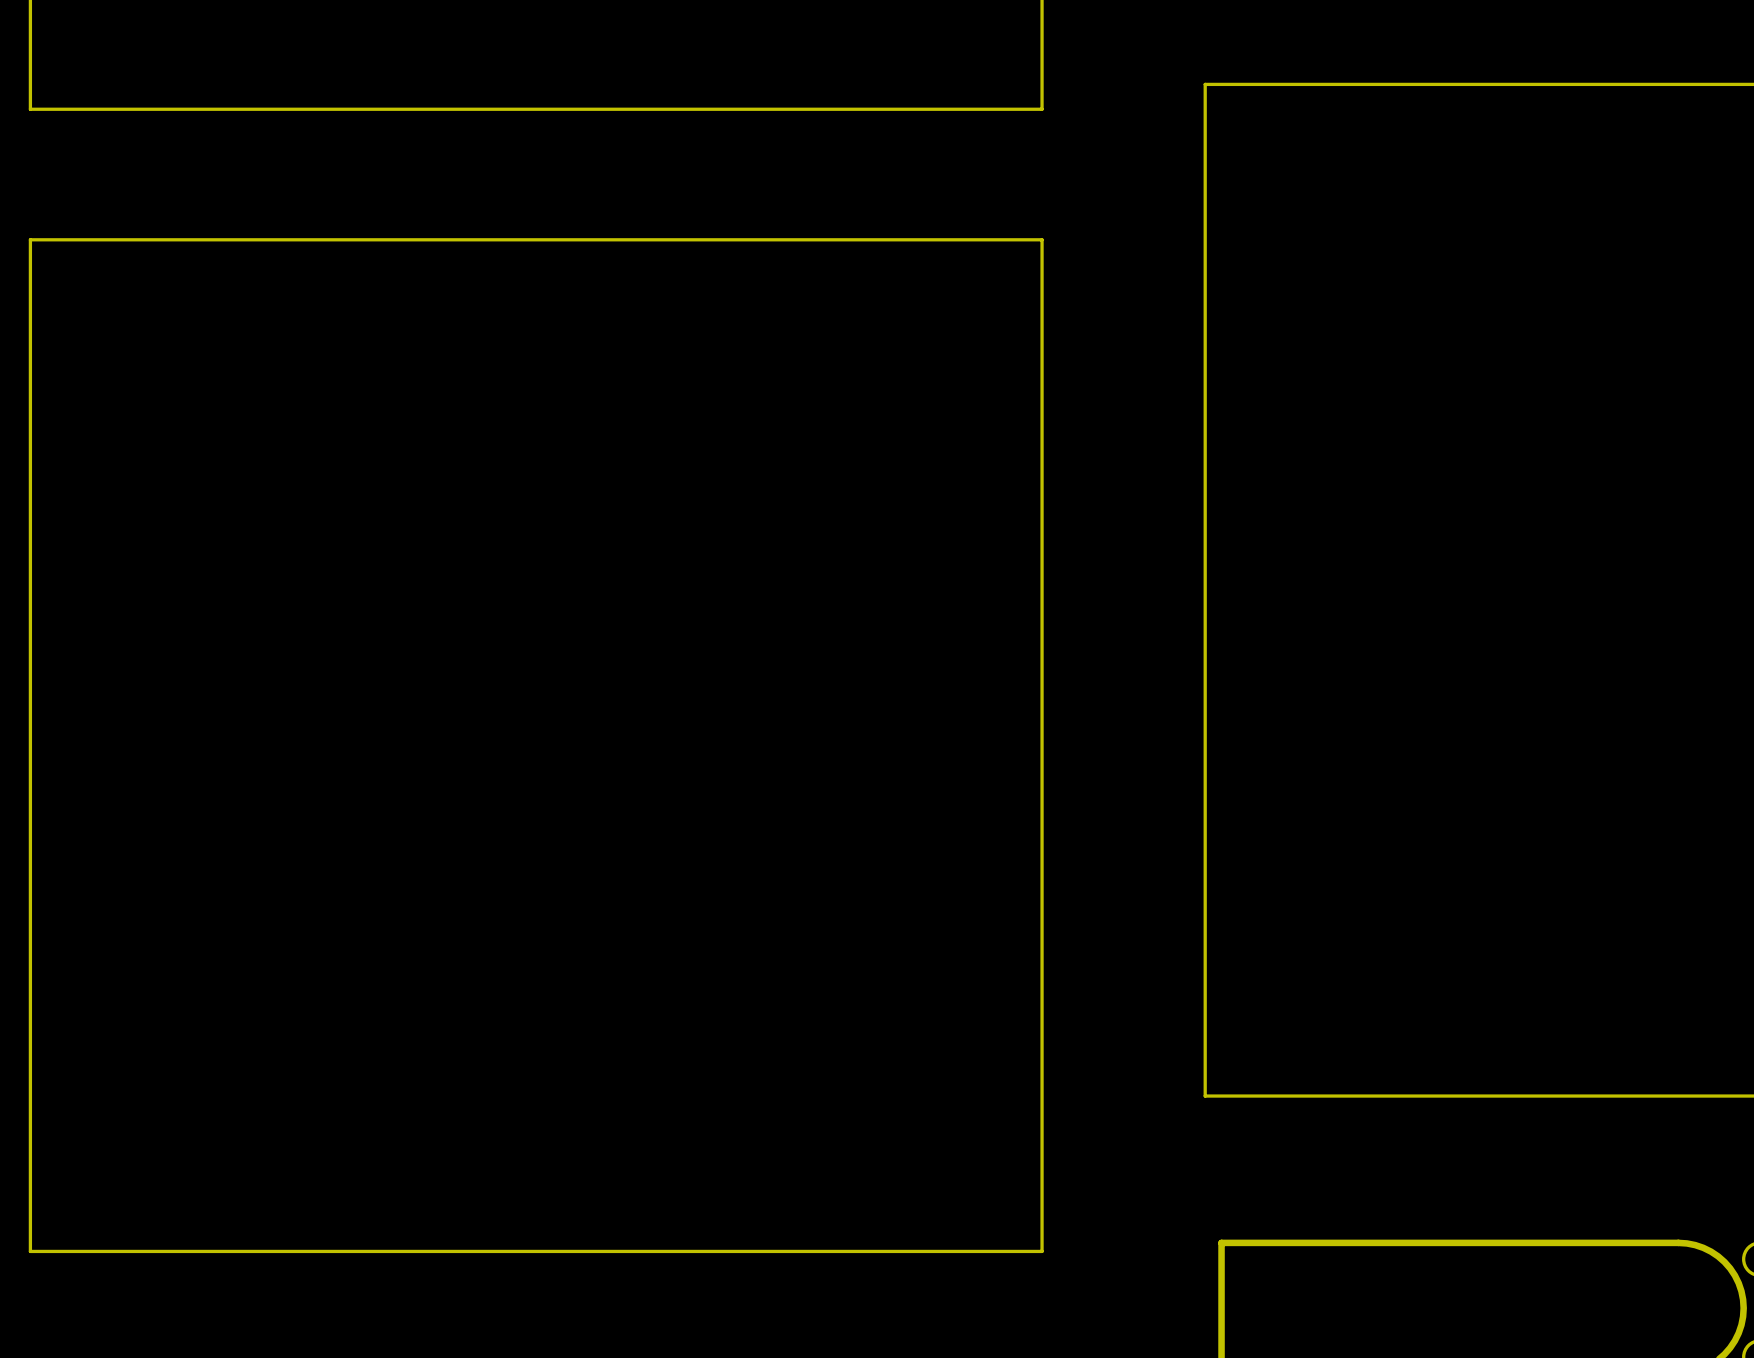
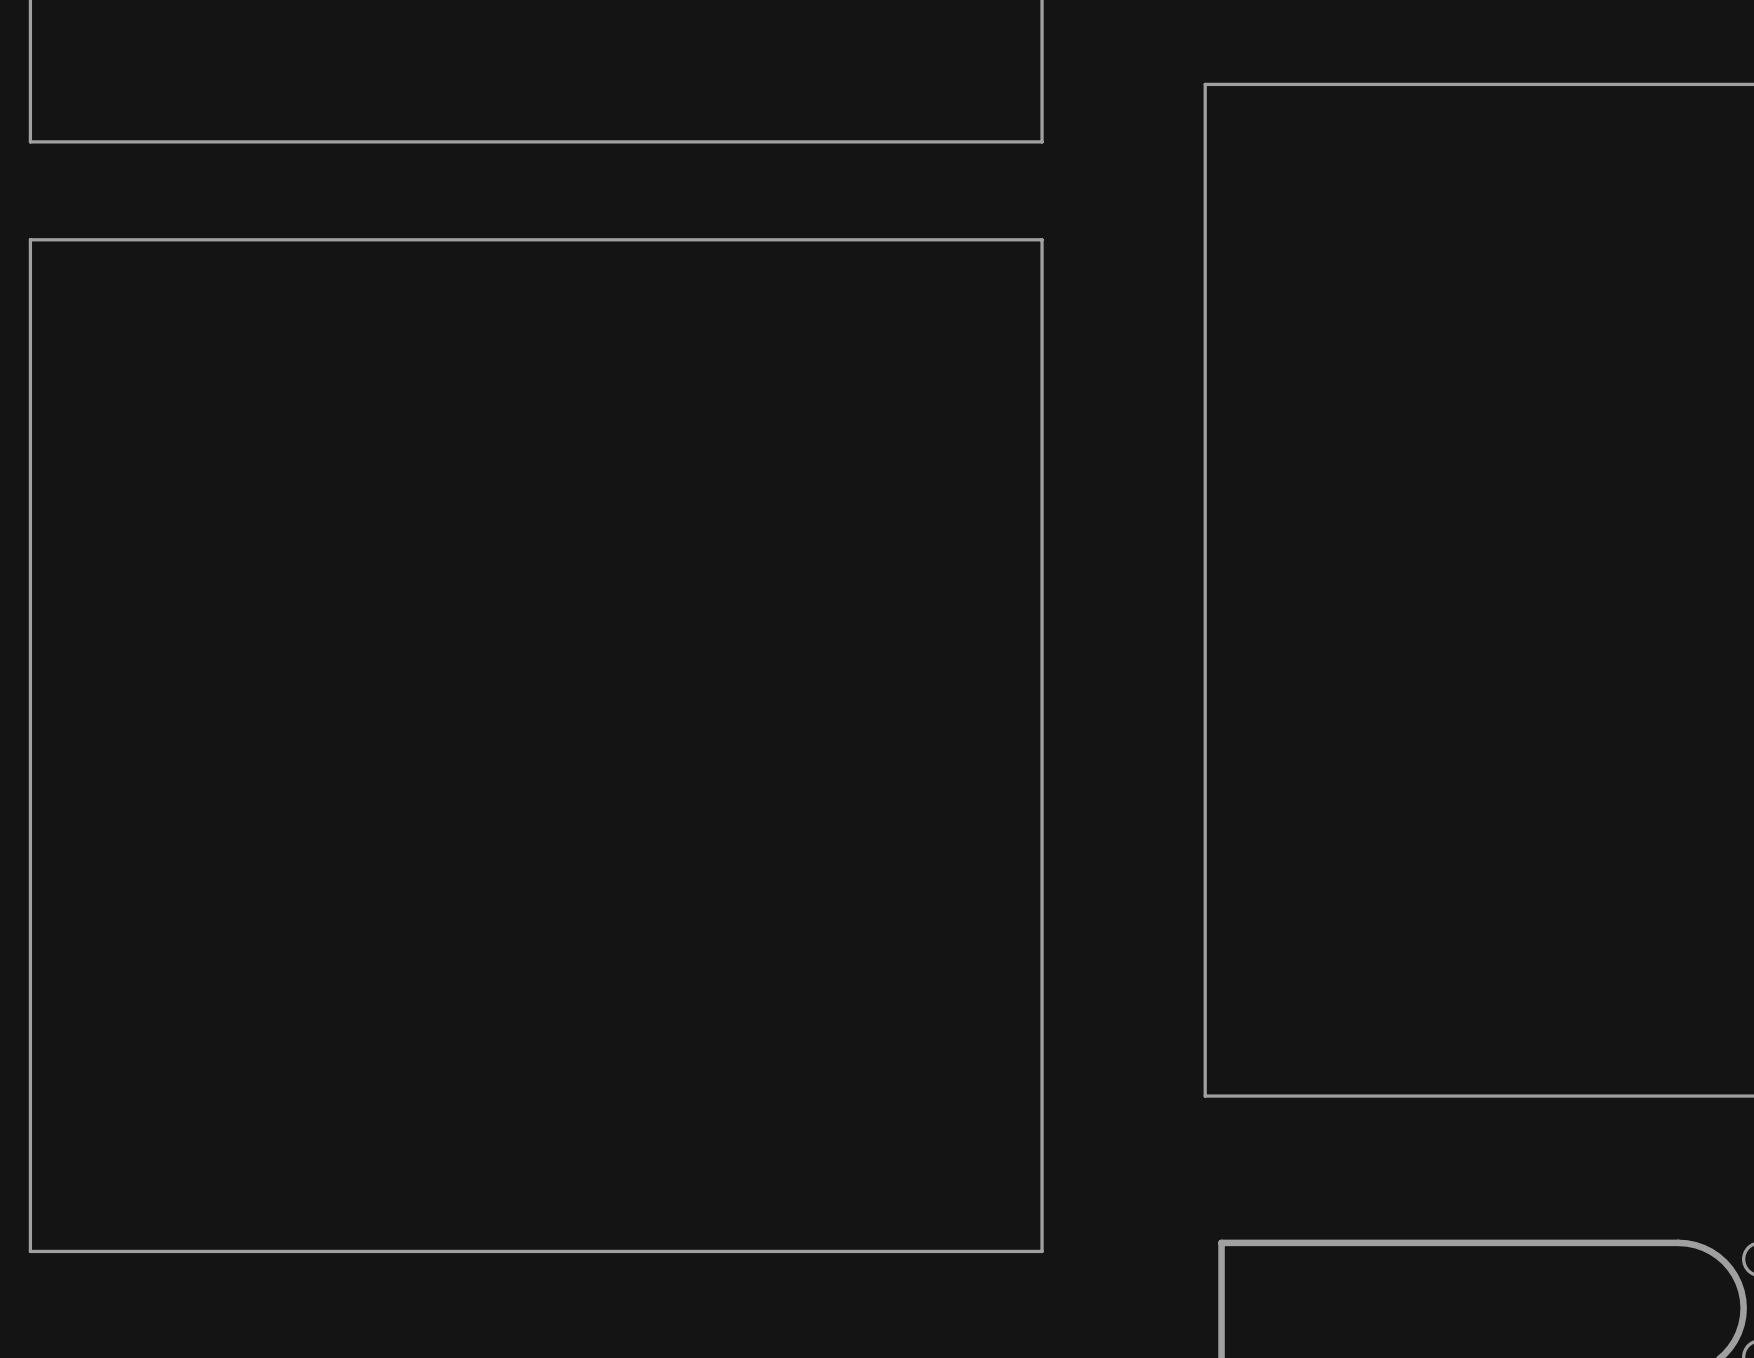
board edge: (1042, 109) (30, 109) -> (1042, 109) (1042, 141) (30, 141) (30, 109)

